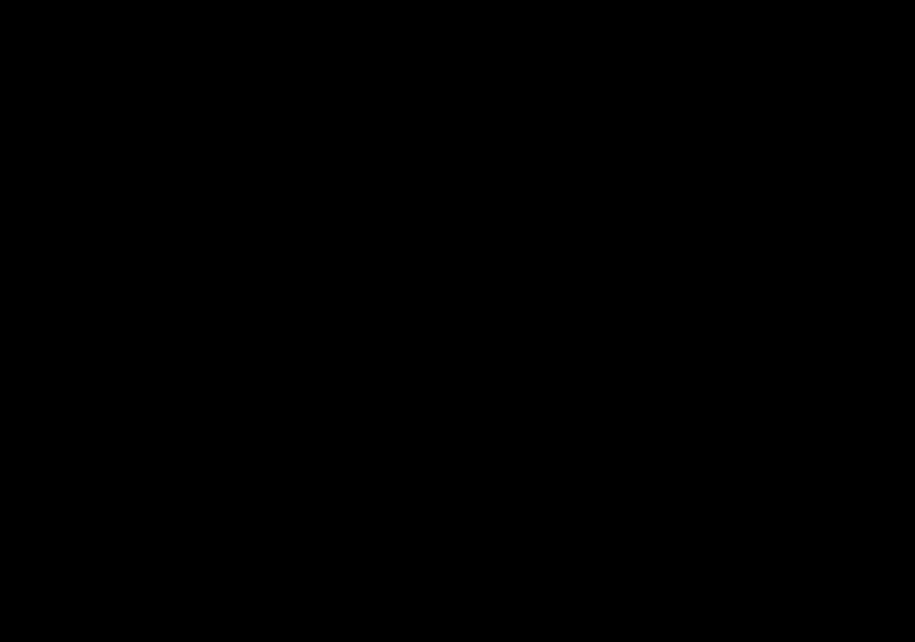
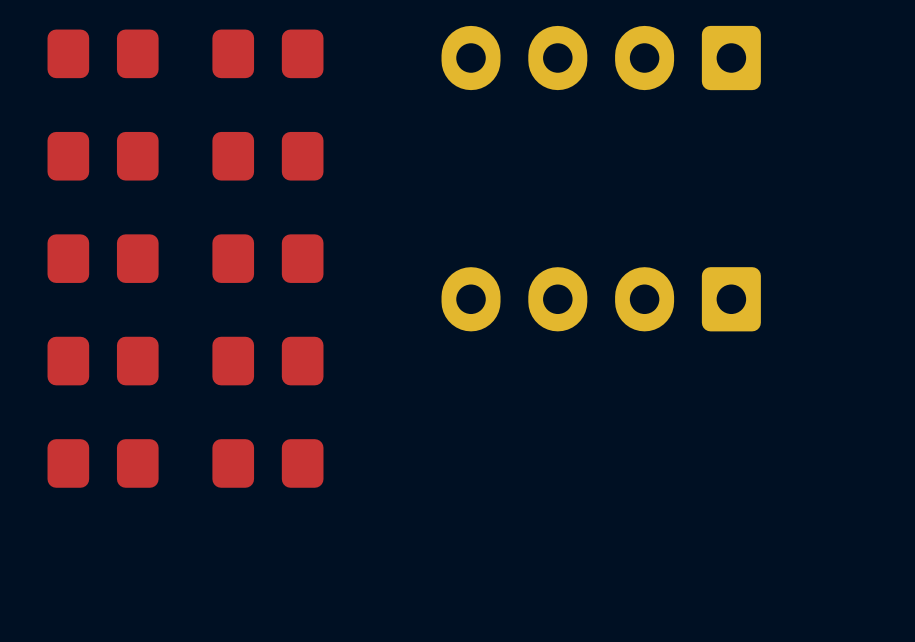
part: none -> (103, 53)
part: none -> (267, 53)
part: none -> (601, 58)
part: none -> (103, 156)
part: none -> (267, 156)
part: none -> (103, 258)
part: none -> (267, 258)
part: none -> (601, 299)
part: none -> (103, 361)
part: none -> (267, 361)
part: none -> (103, 463)
part: none -> (267, 463)

